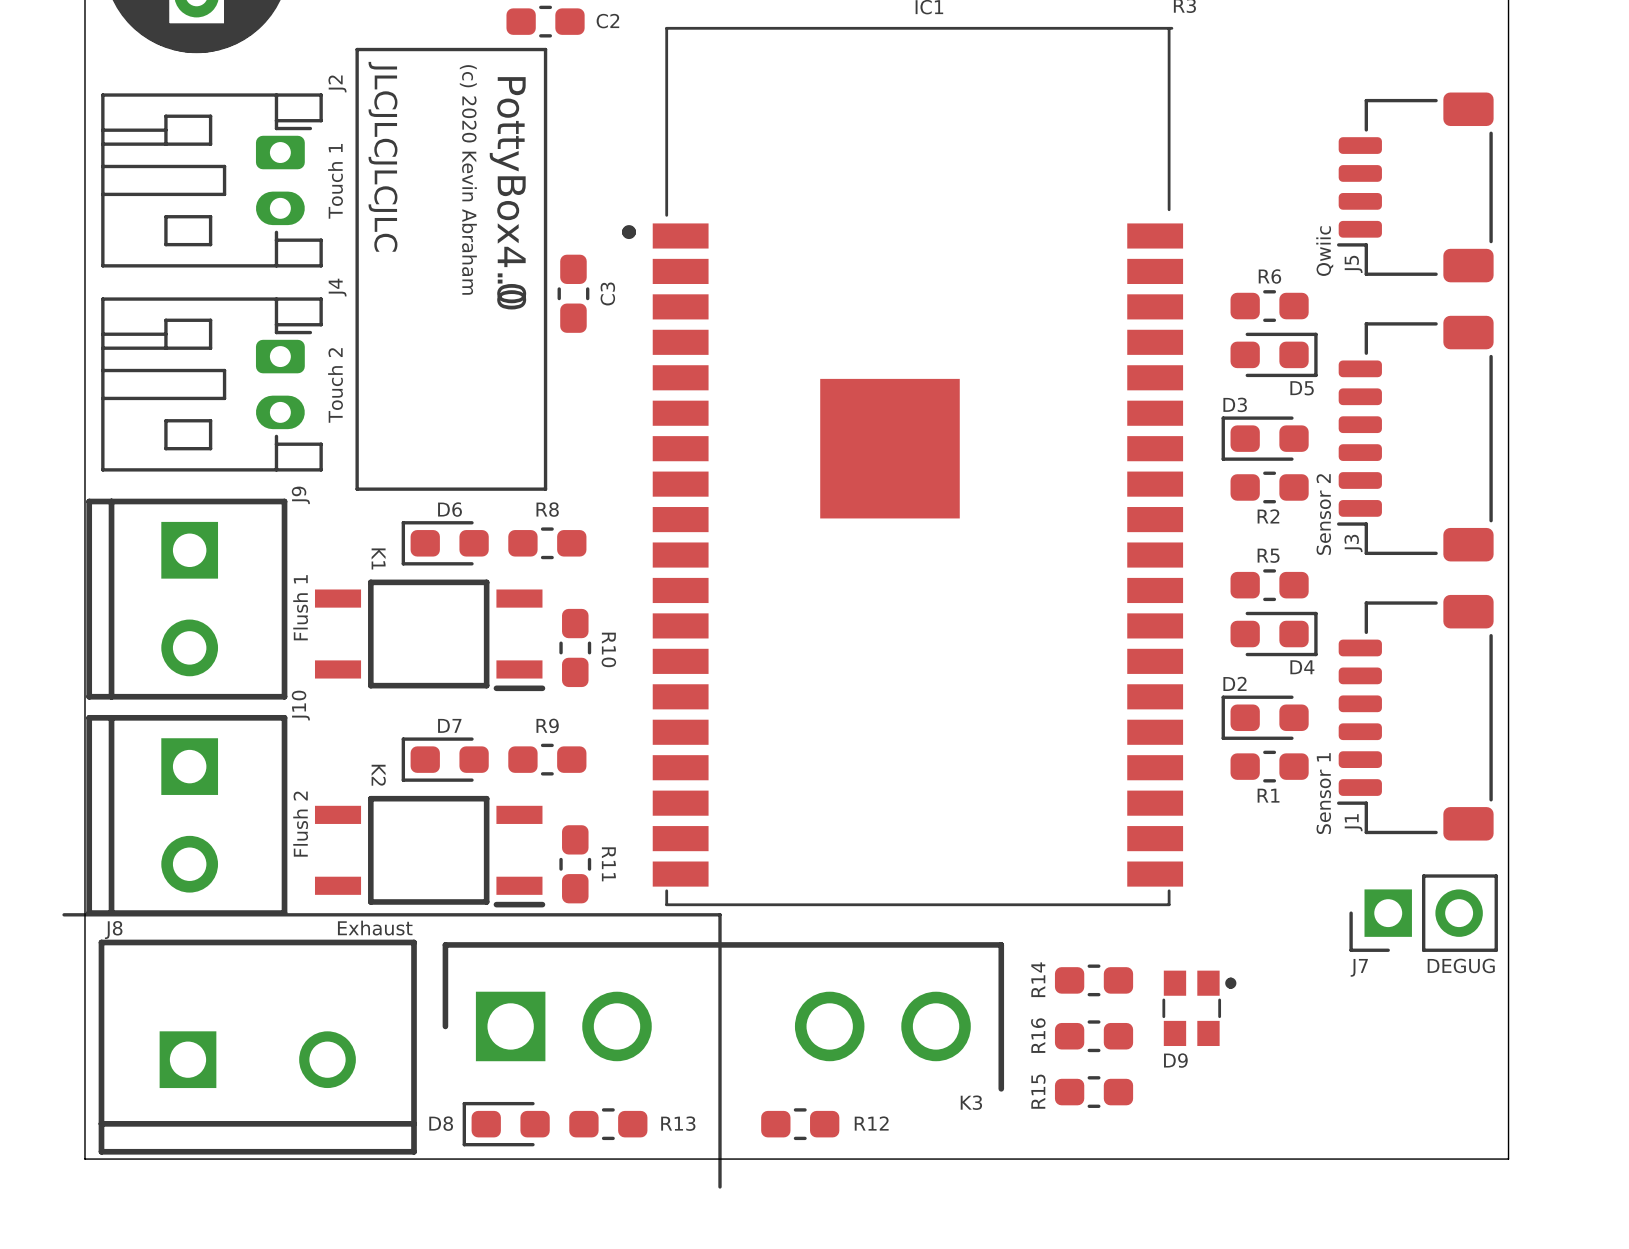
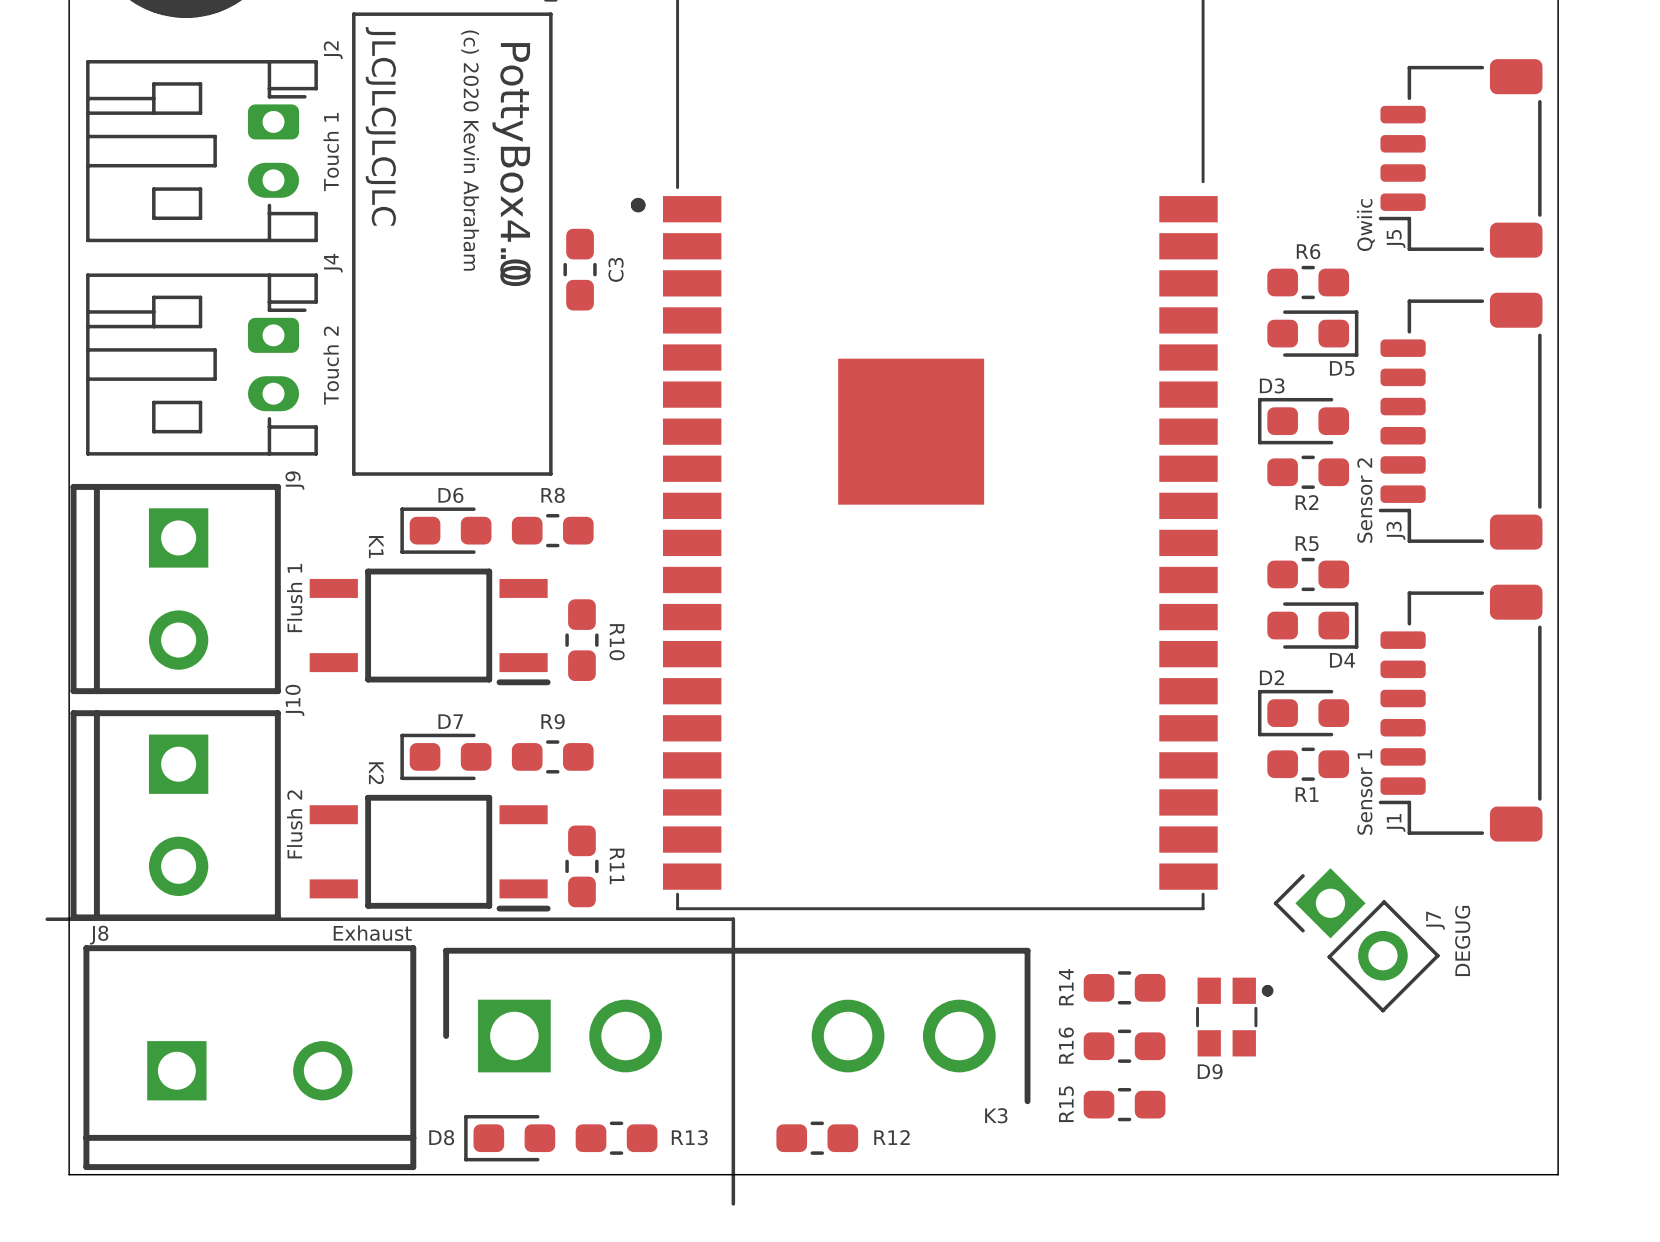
J7 rotation: 0° (1423, 913) -> 45° clockwise (1356, 940)
J7 position: (1423, 913) -> (1356, 940)
J7 value position: DEGUG (1461, 965) -> DEGUG (1462, 940)
J7 name position: J7 (1359, 967) -> J7 (1435, 920)

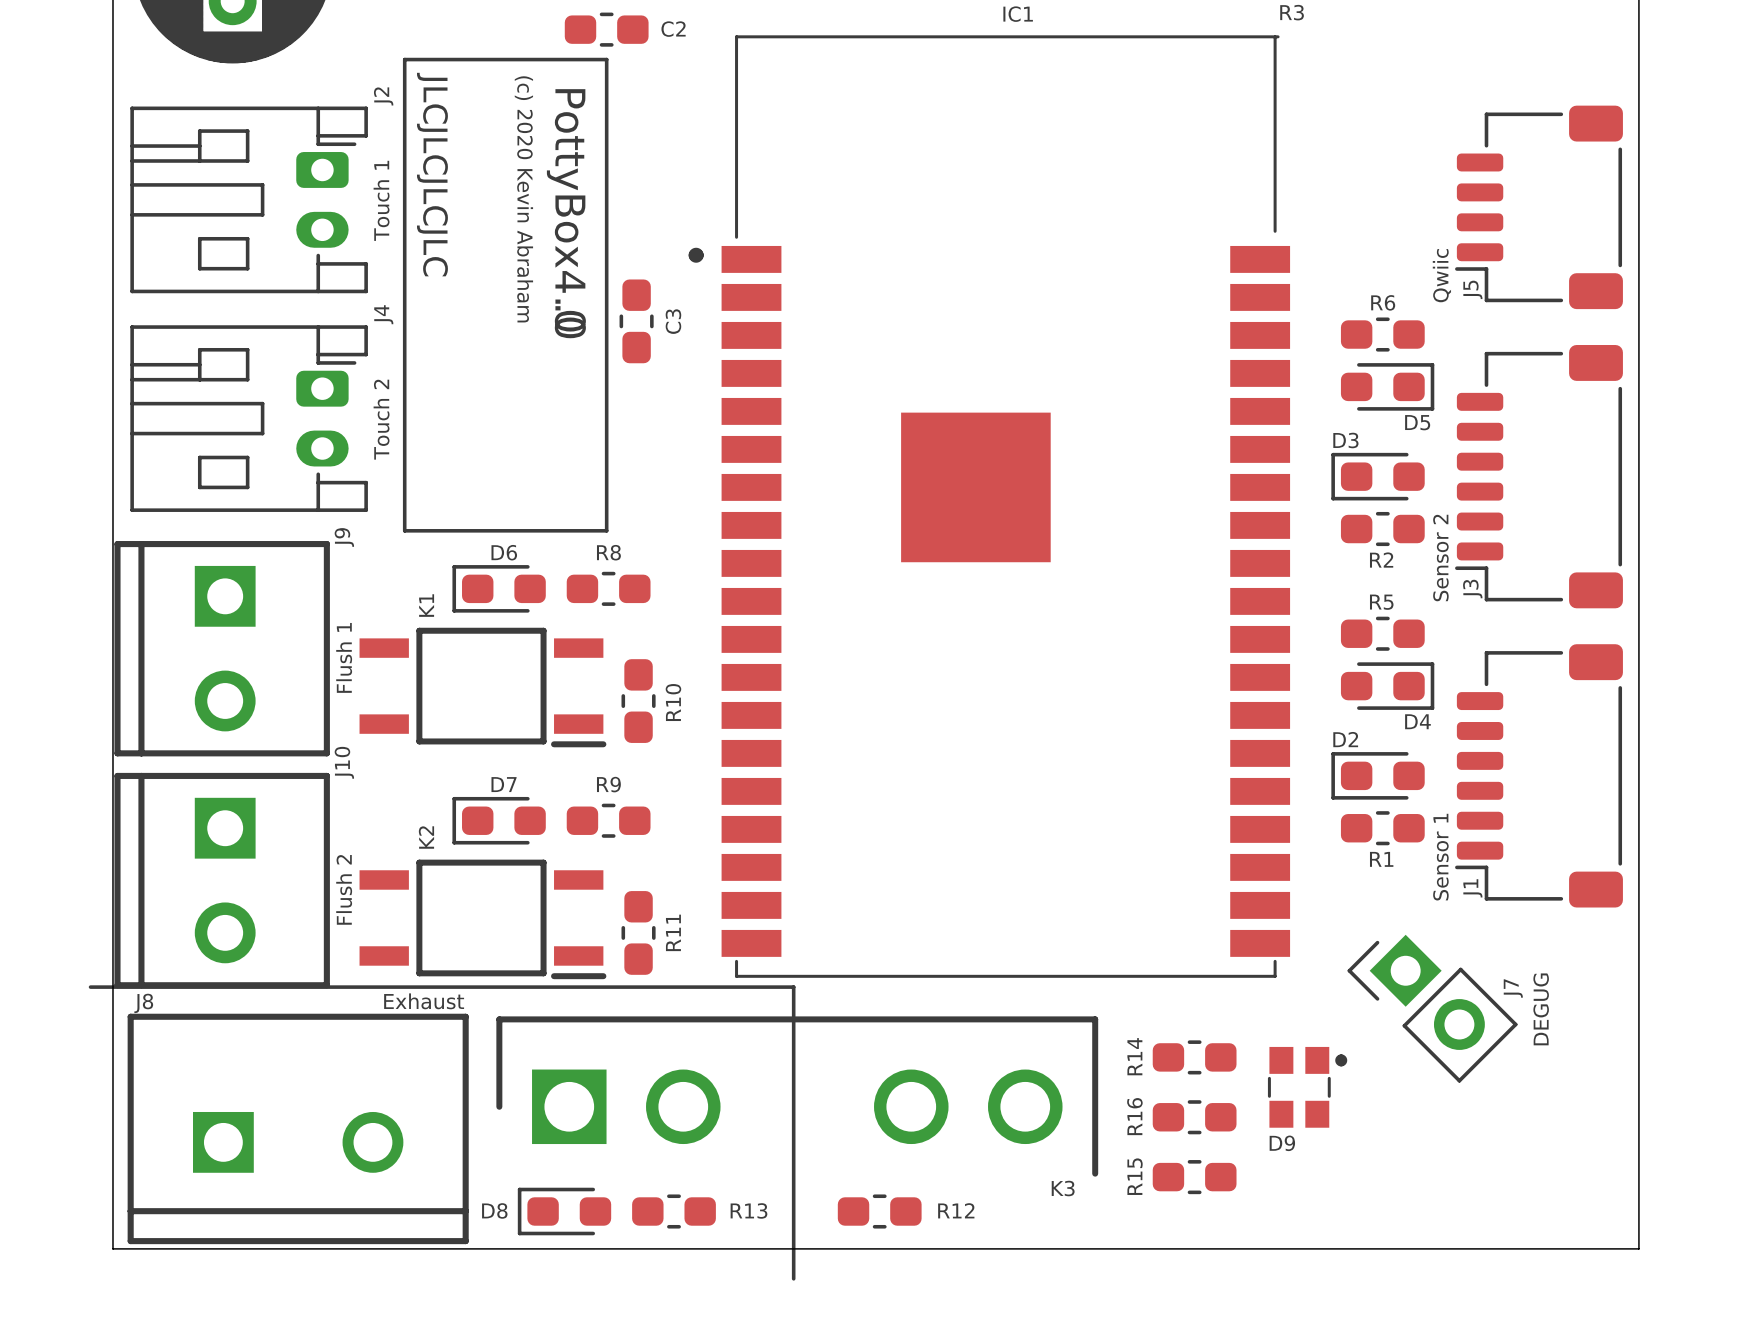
K1 name rotation: 0° (376, 547) -> 180° (426, 605)
R10 name rotation: 0° (617, 642) -> 180° (673, 702)
K2 name rotation: 0° (376, 773) -> 180° (426, 837)
R11 name rotation: 0° (617, 866) -> 180° (673, 932)

